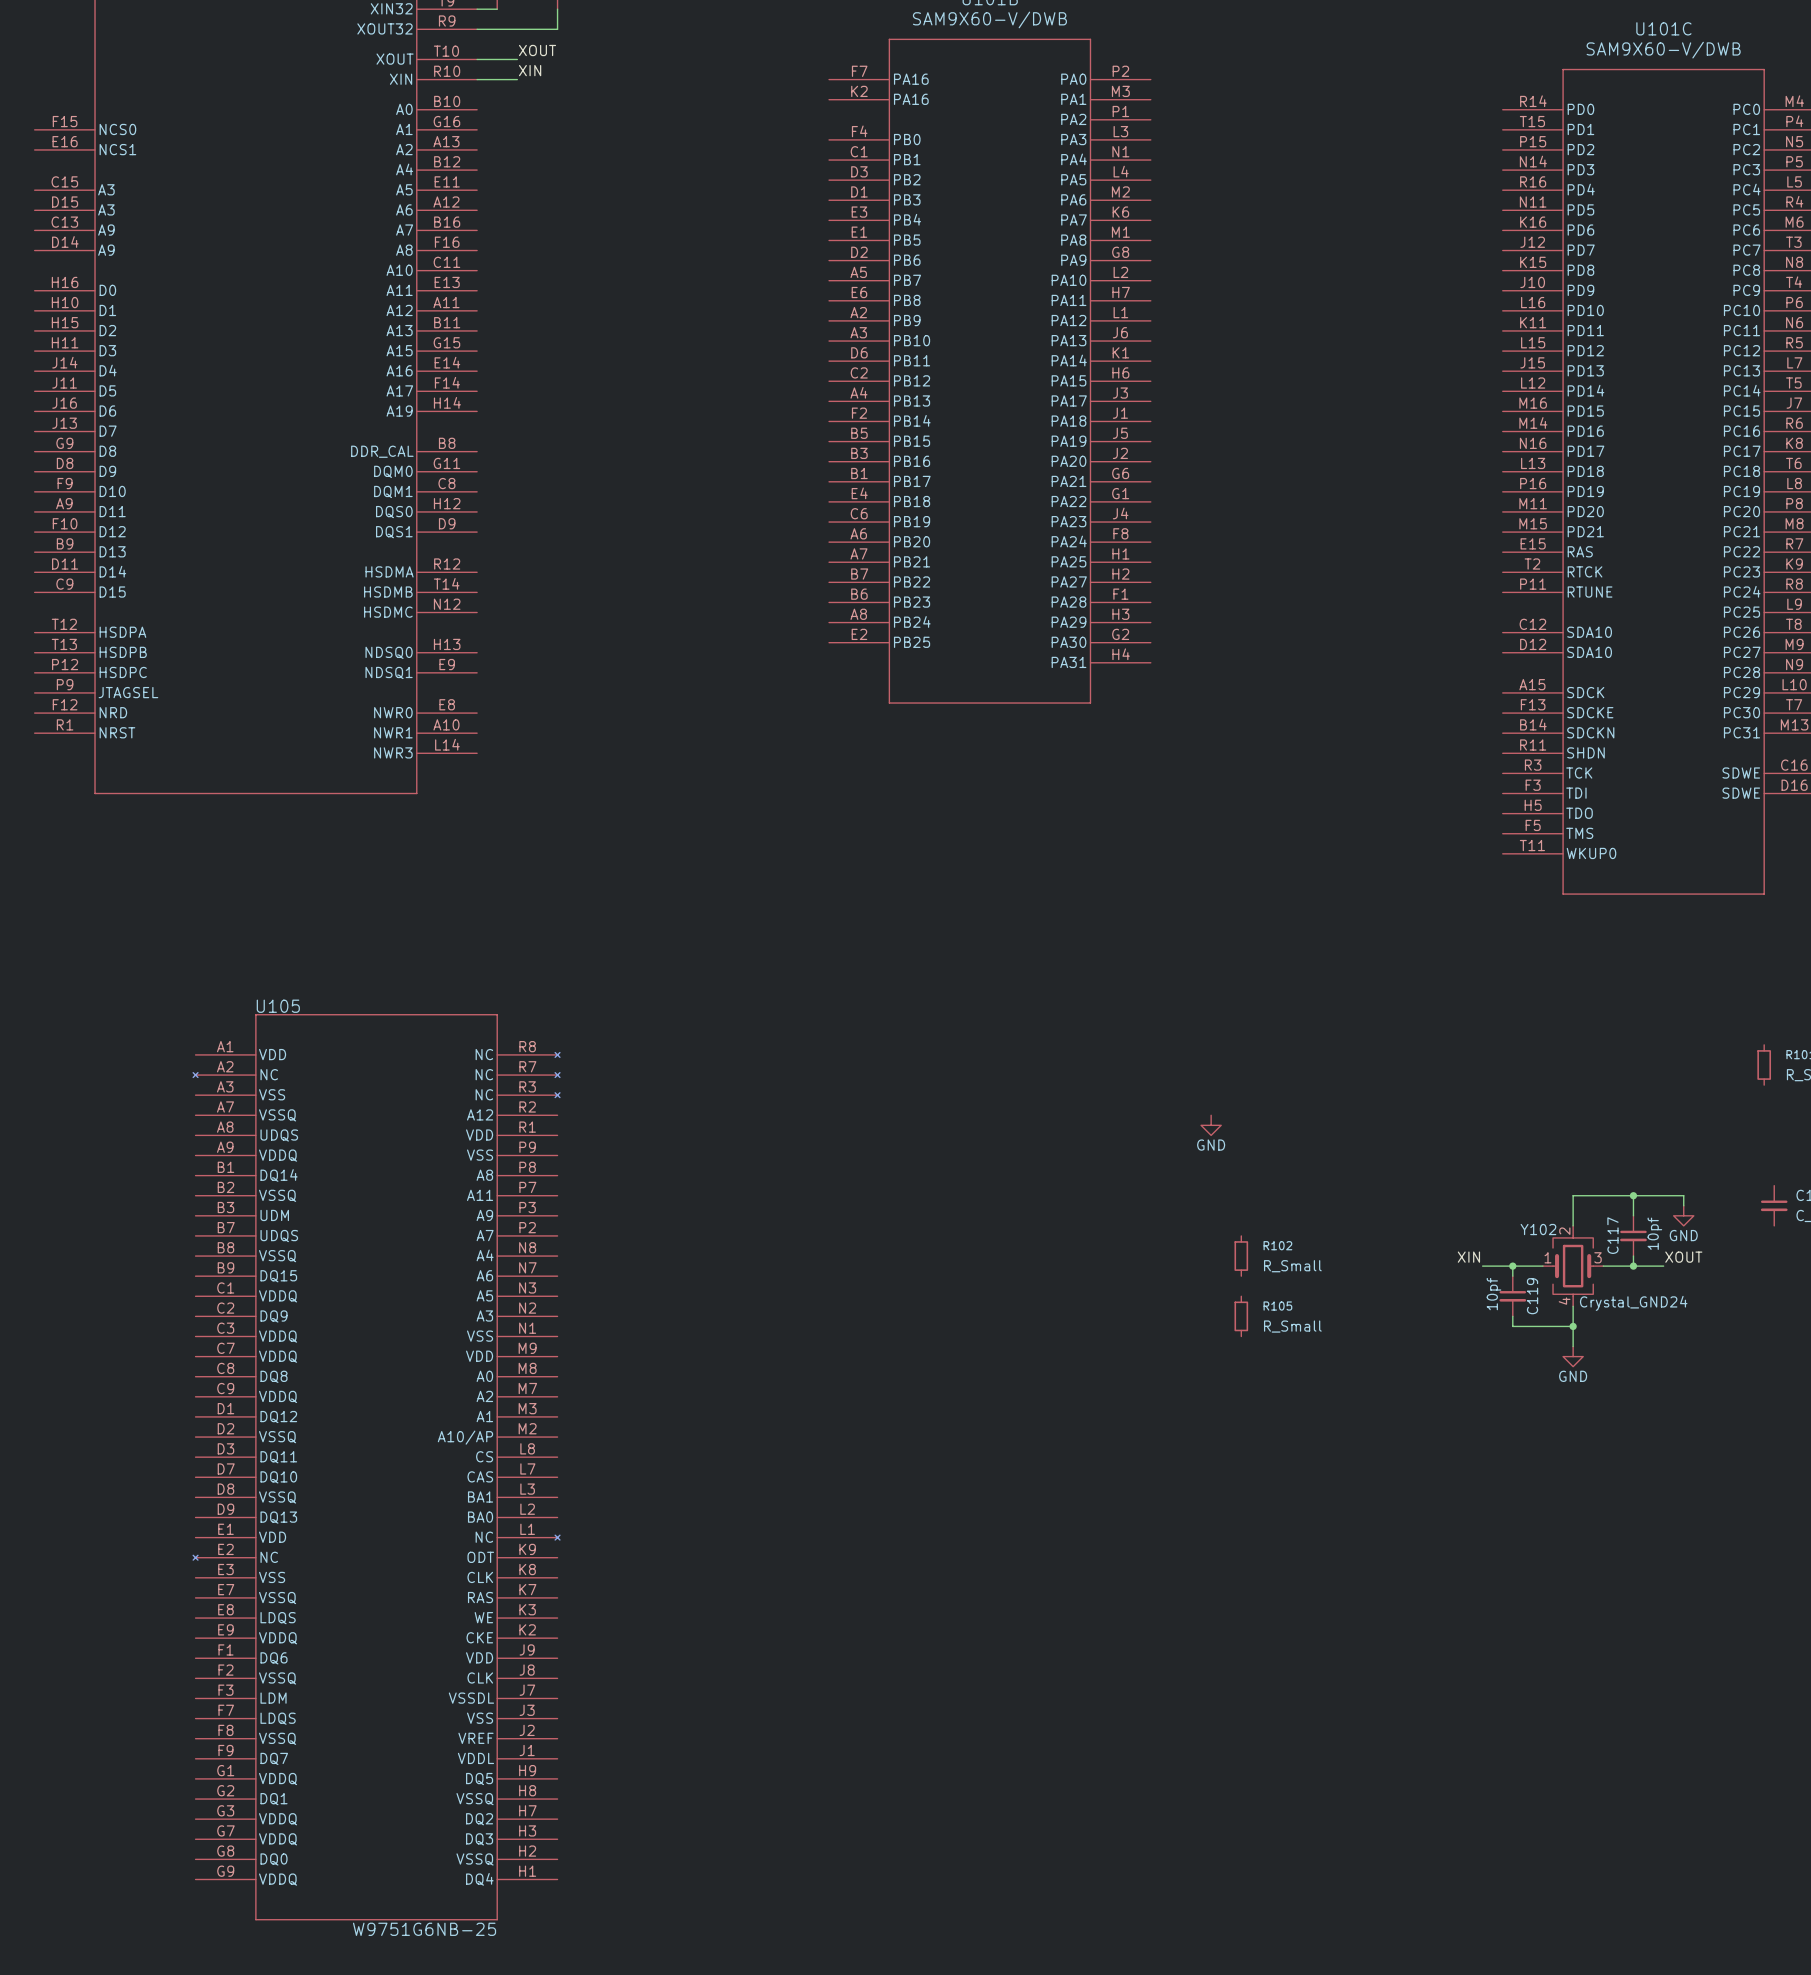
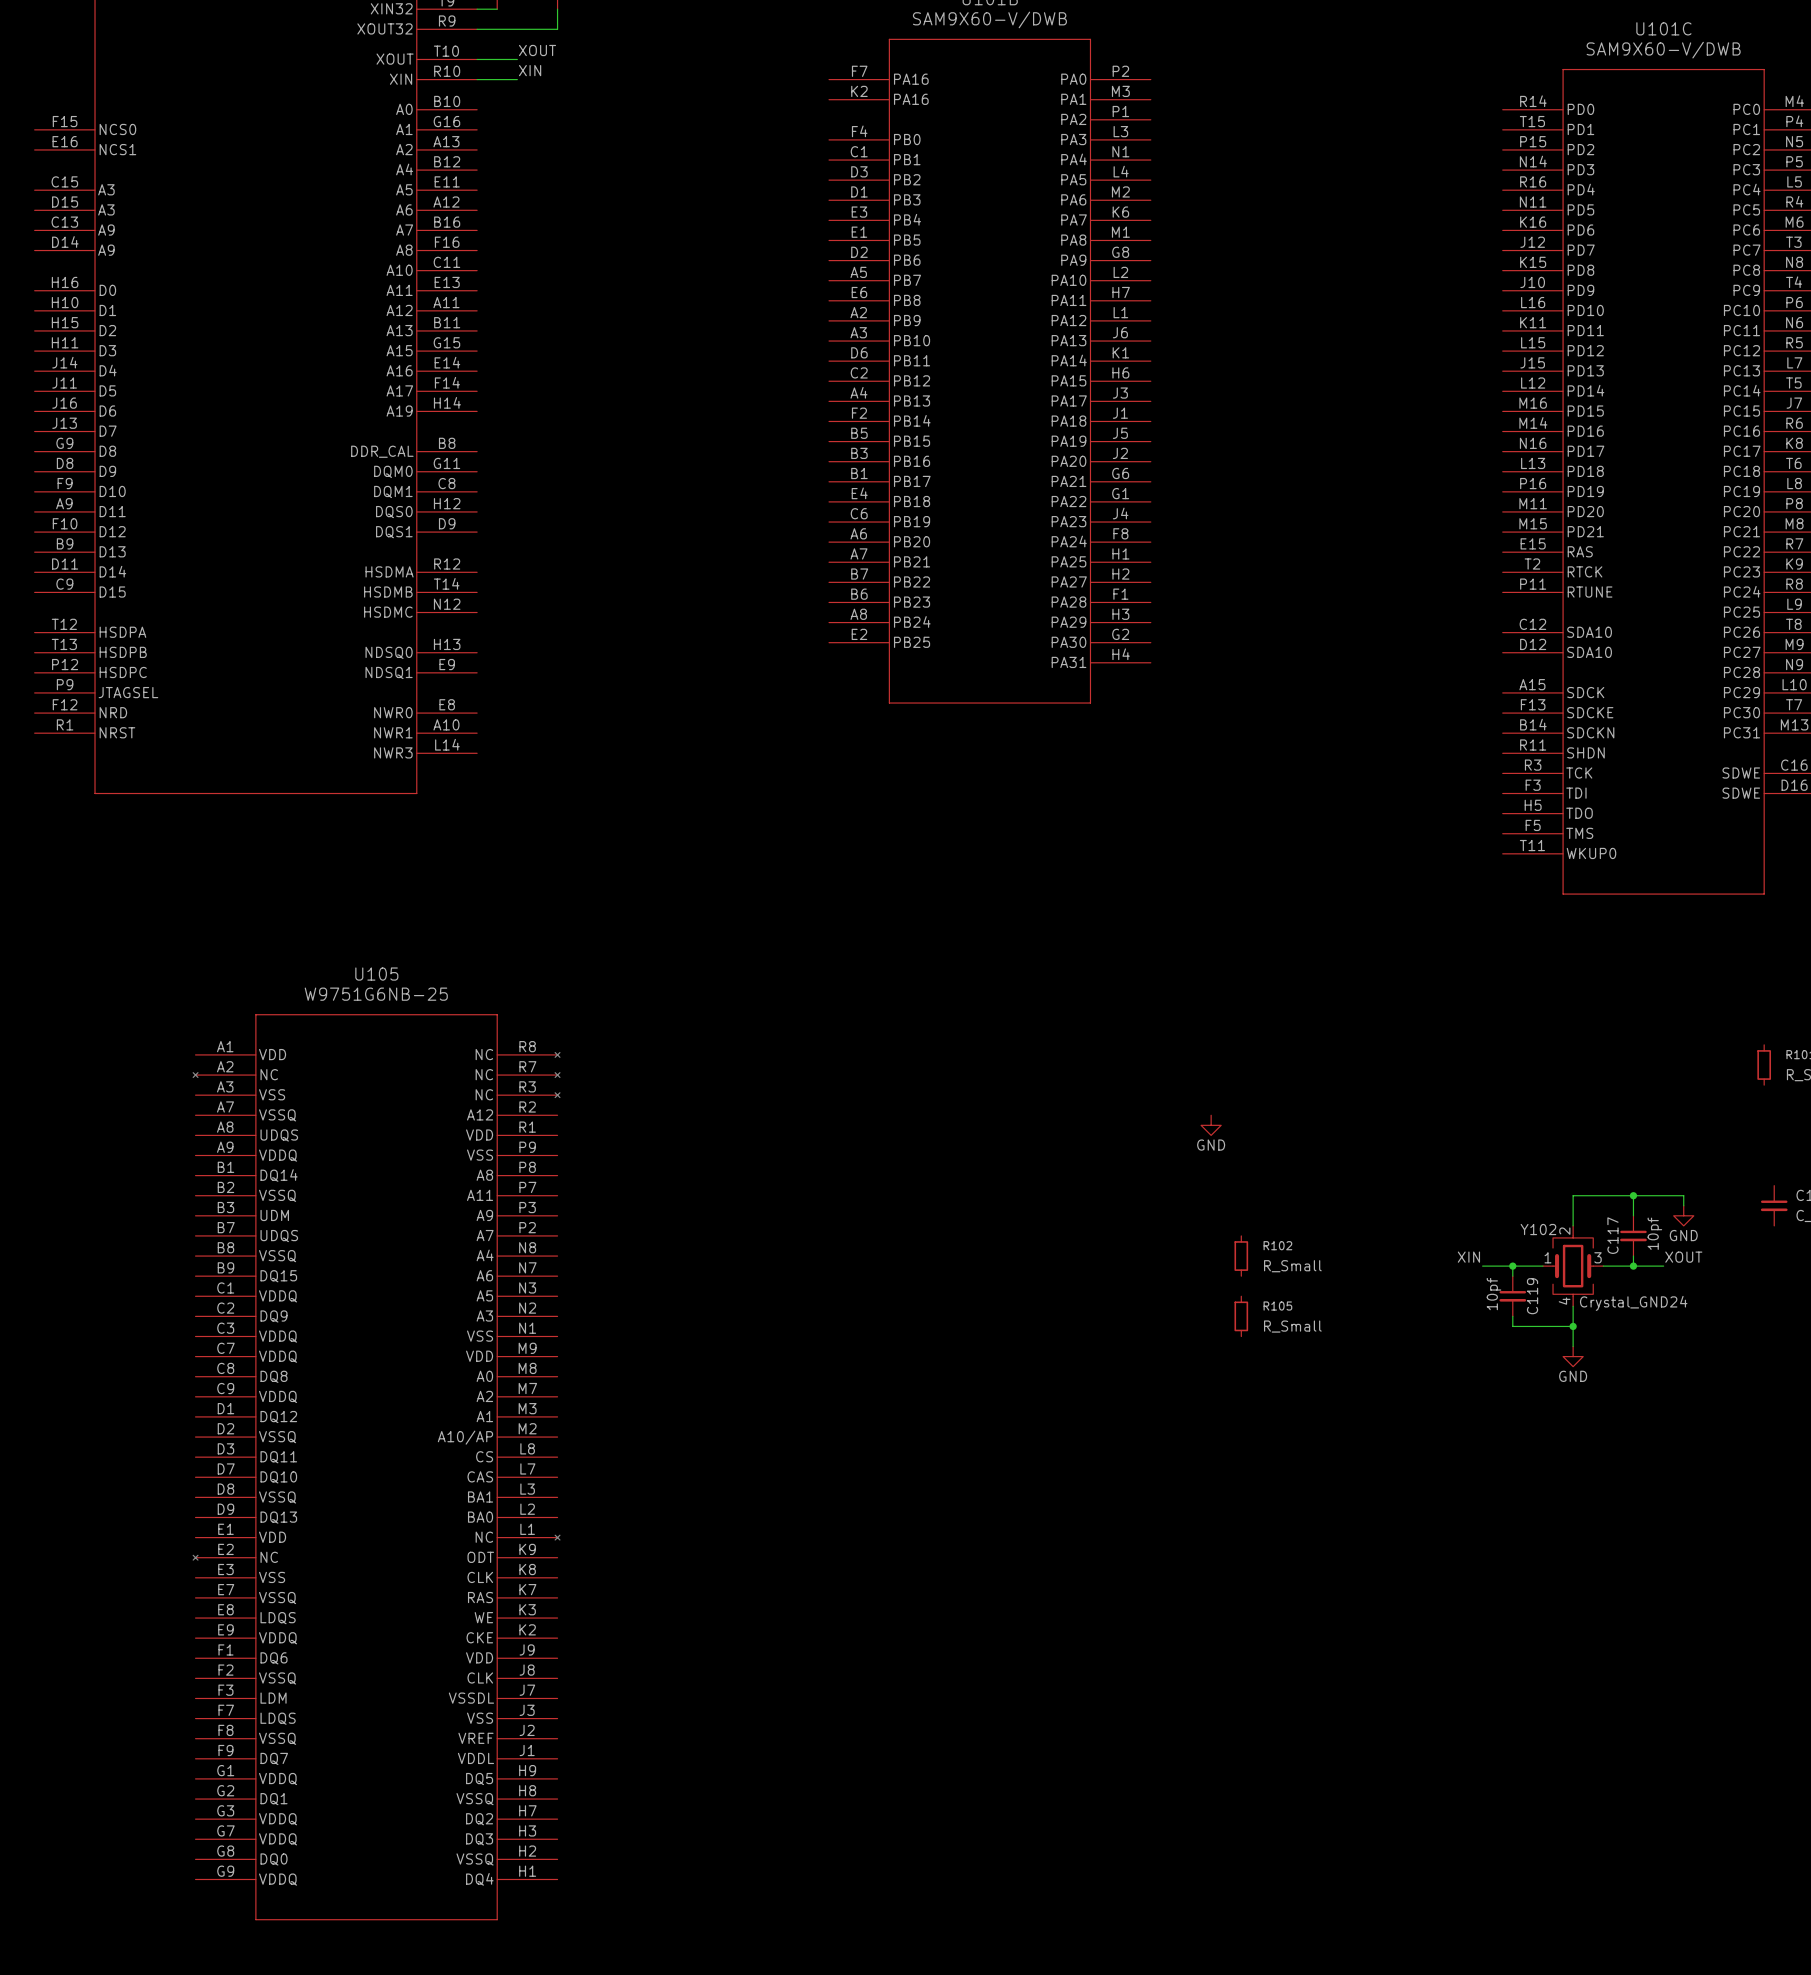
U105 name position: U105 (278, 1006) -> U105 (376, 974)
U105 value position: W9751G6NB-25 (424, 1929) -> W9751G6NB-25 (376, 994)

